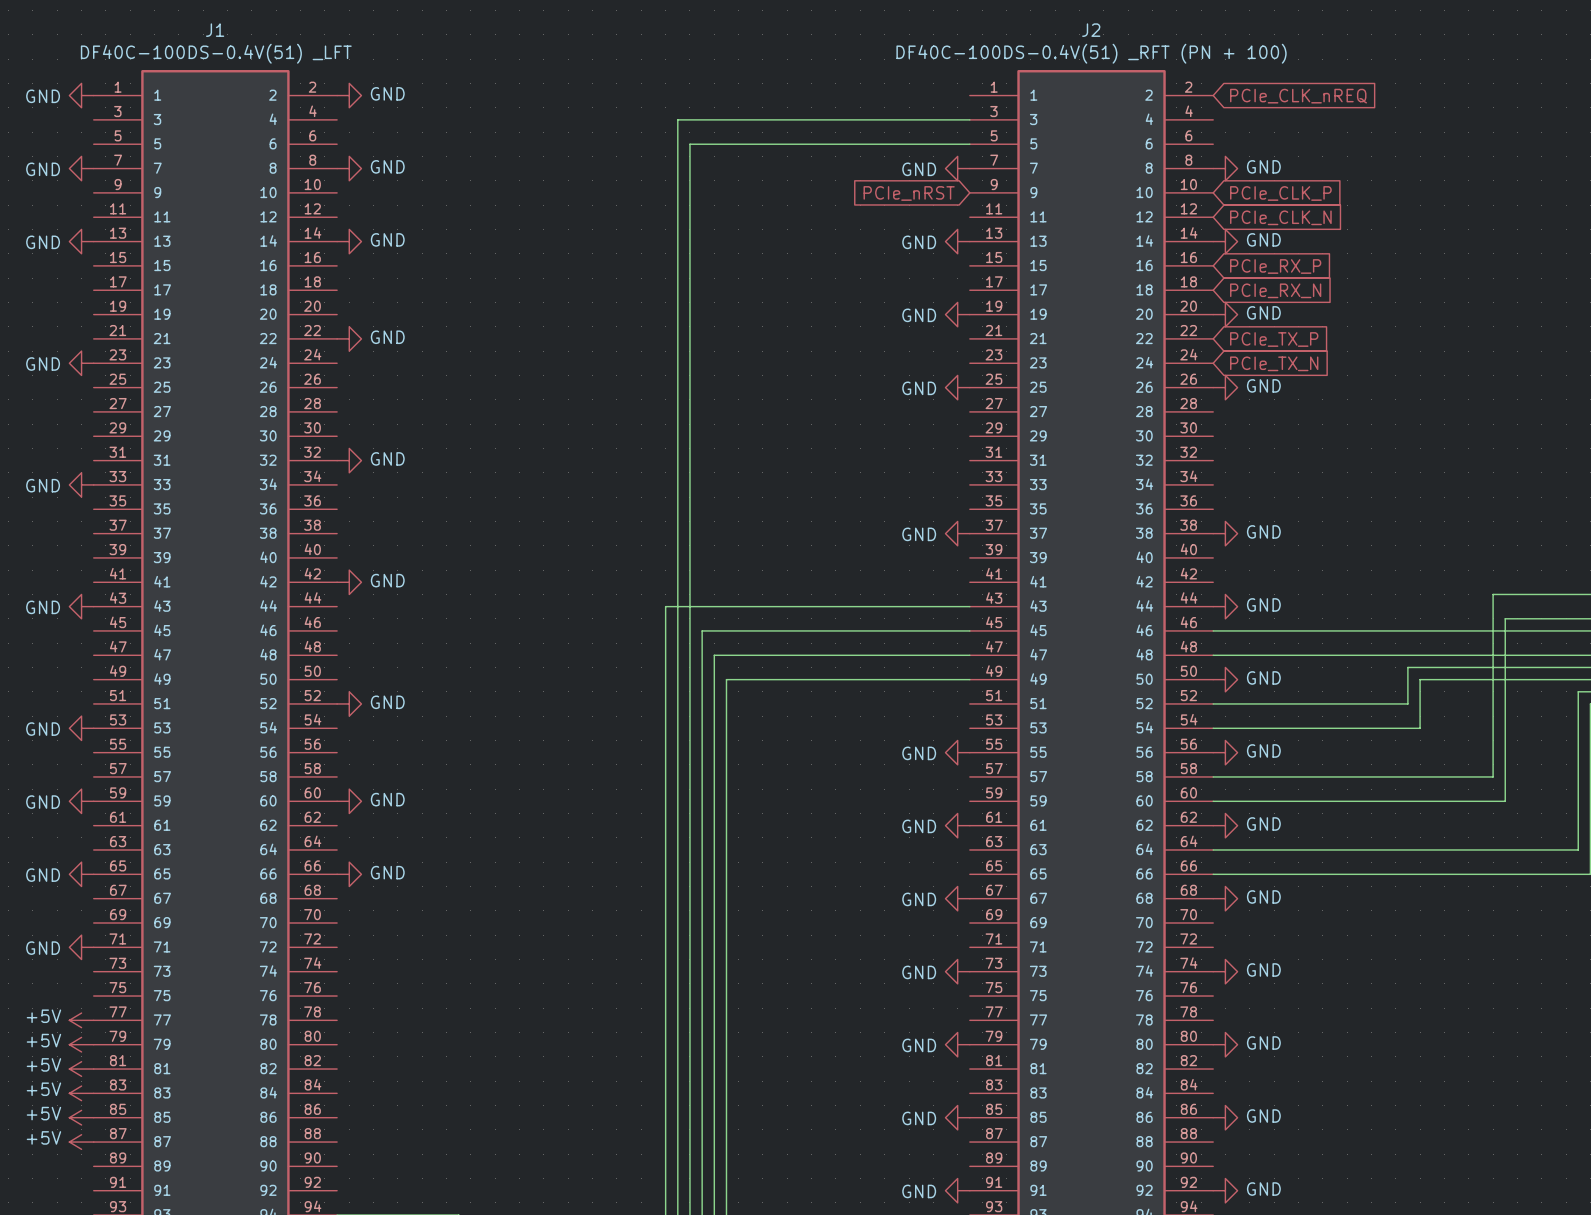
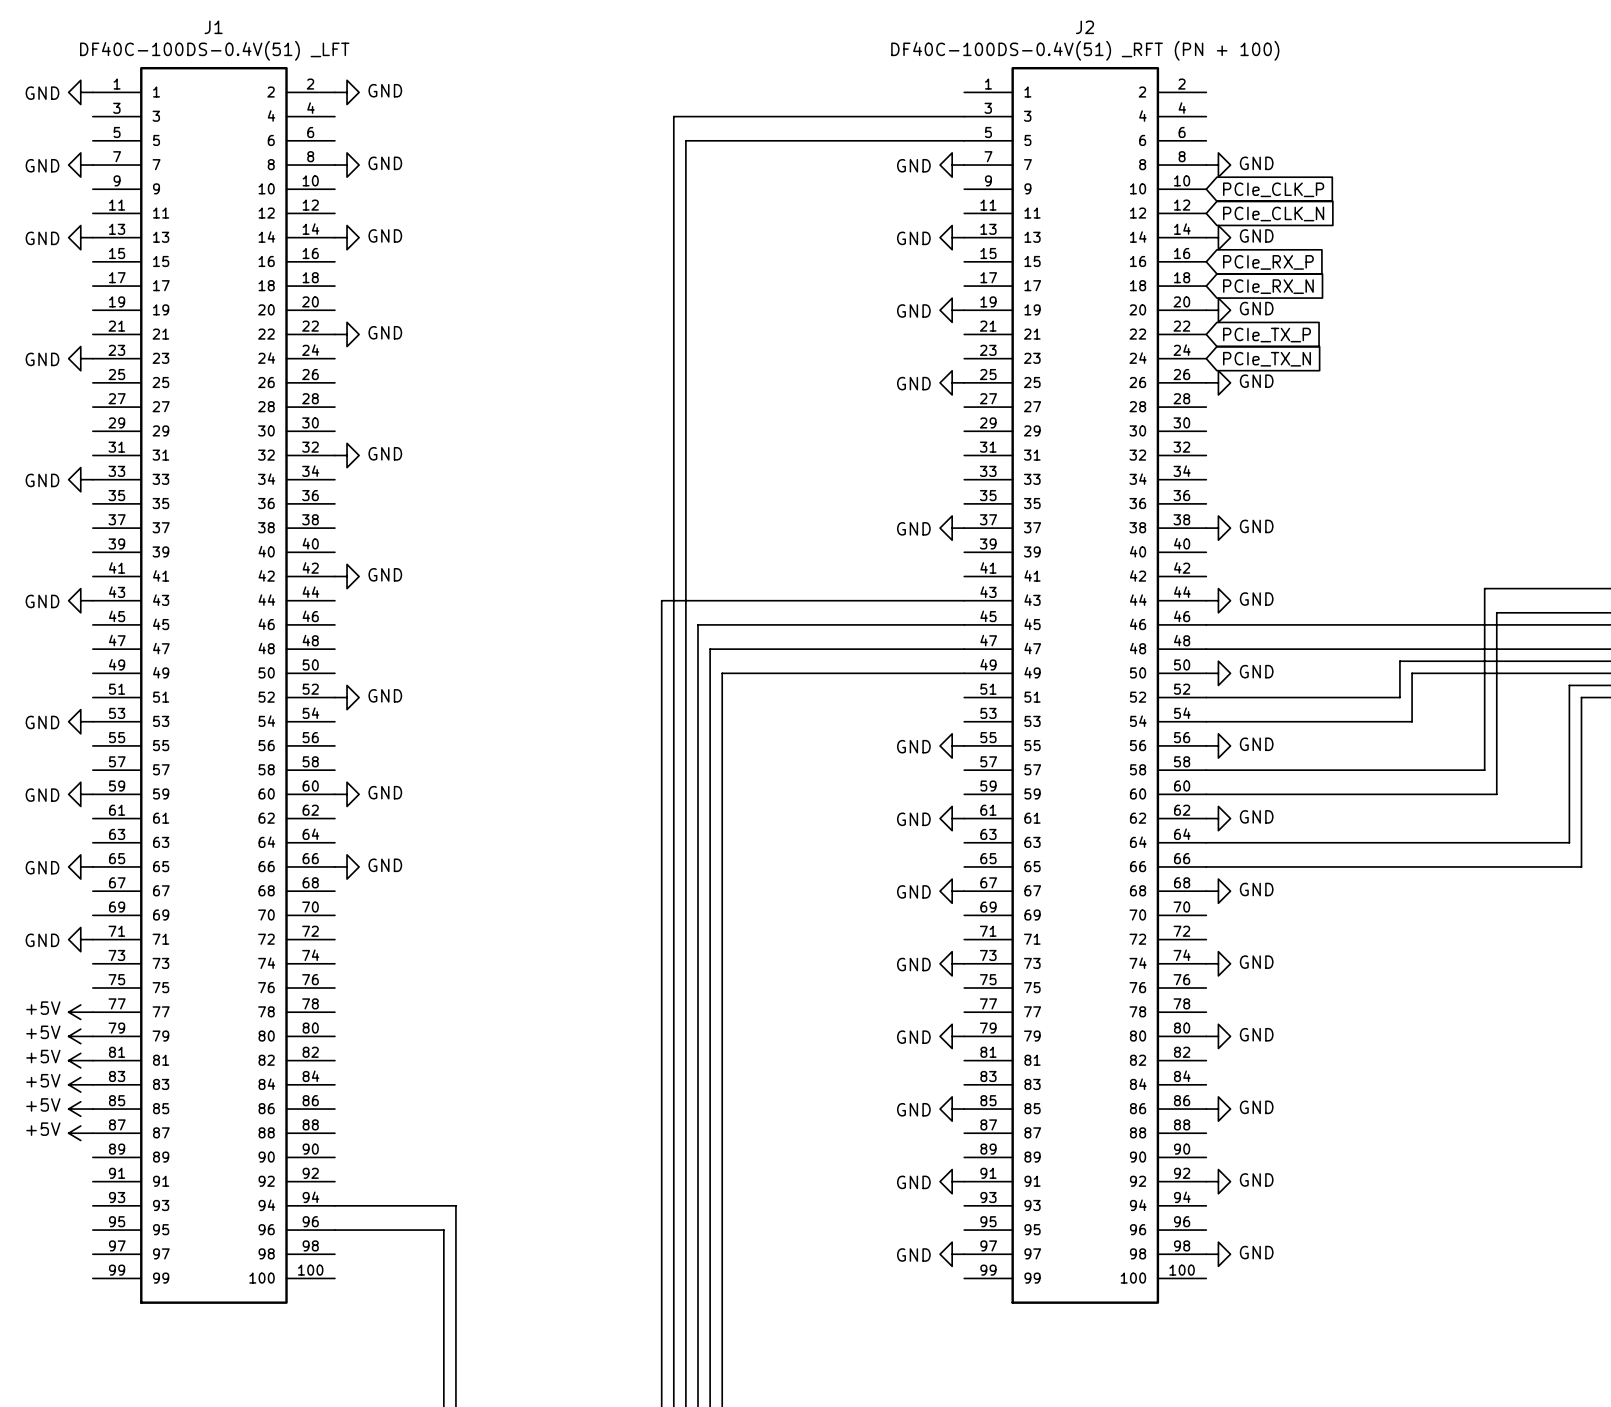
global label: PCIe_CLK_nREQ (1298, 96) -> none
global label: PCIe_nRST (909, 193) -> none

